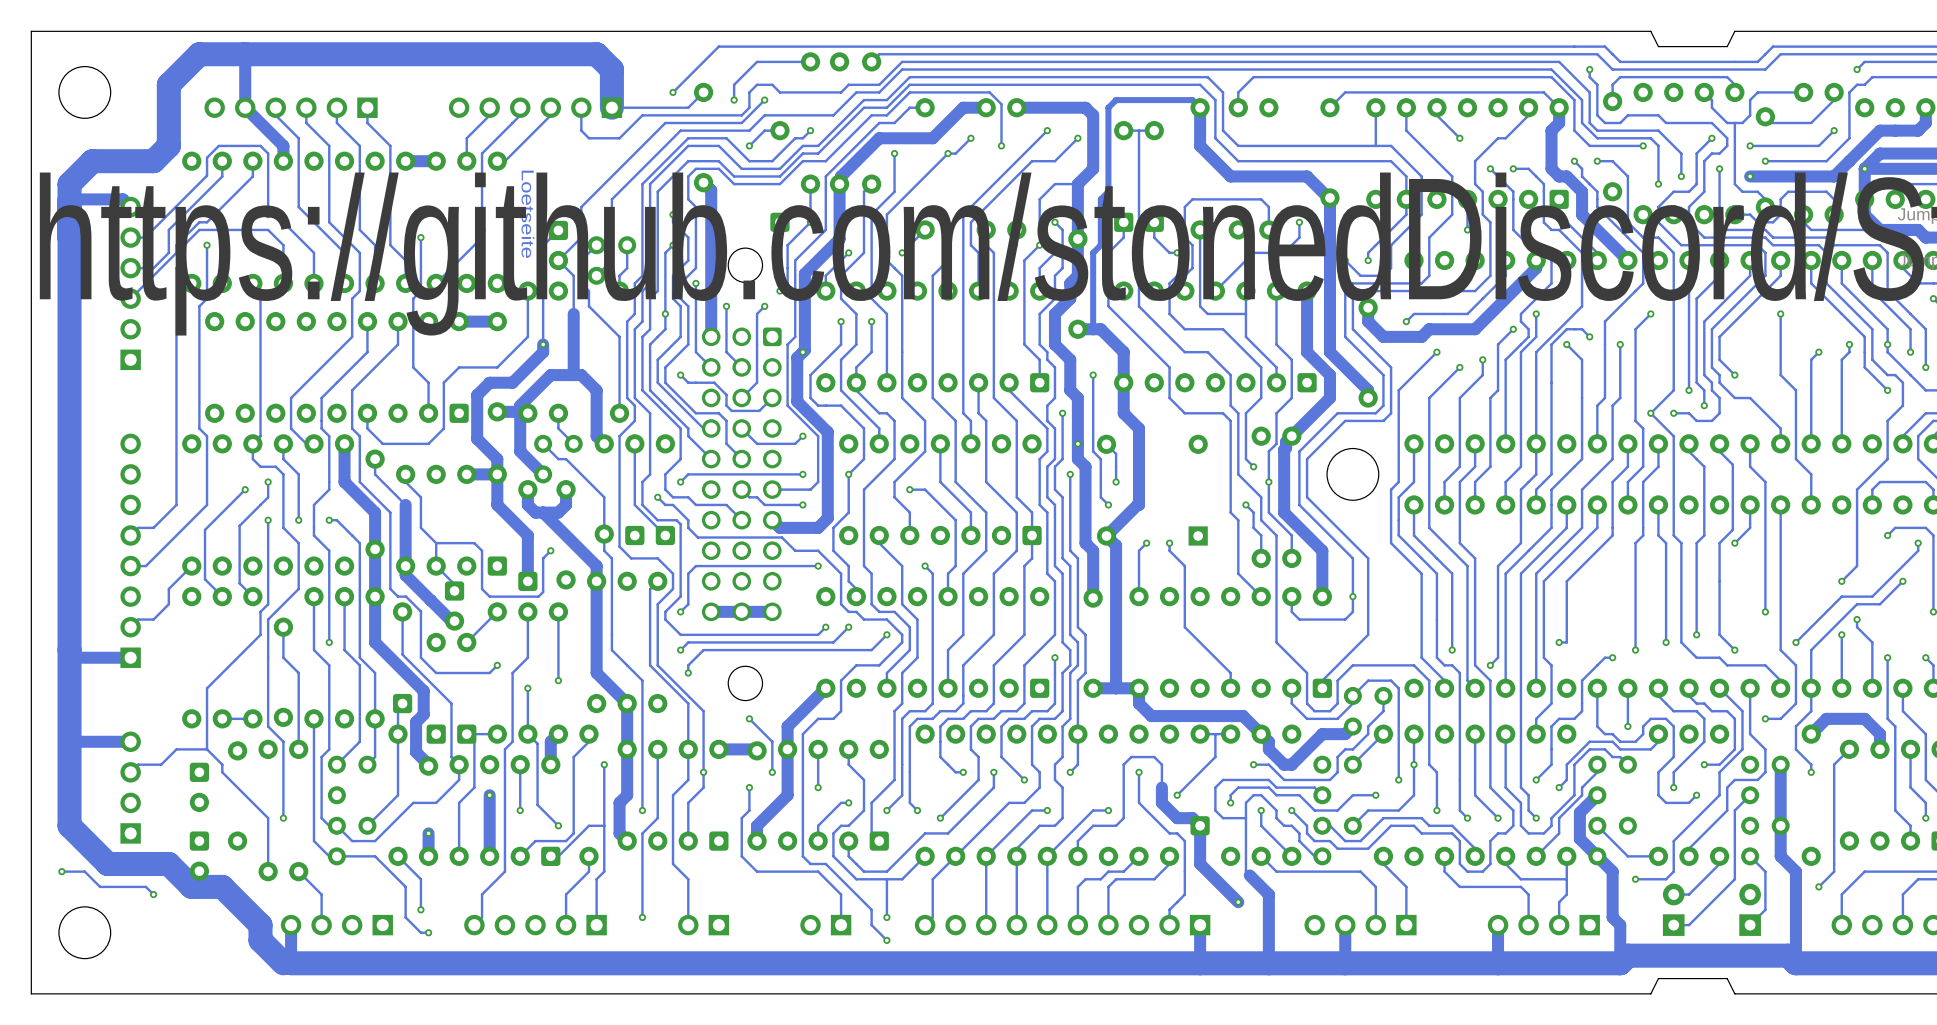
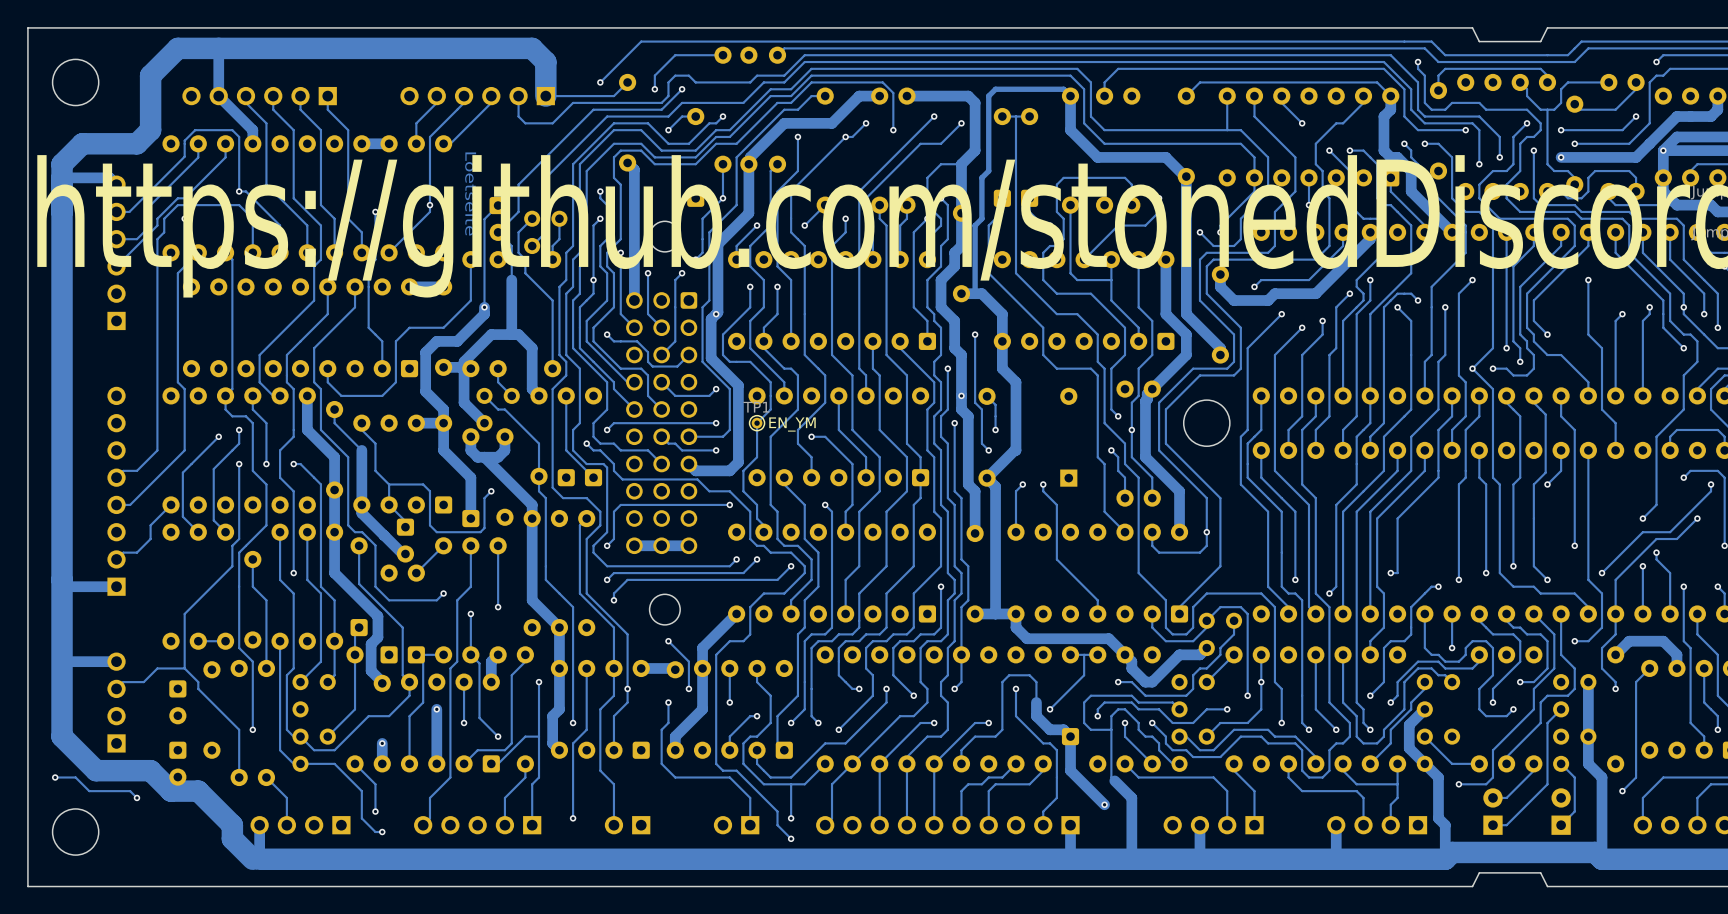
TP1: none -> EN_YM (757, 423)
via: (848, 474) -> none

